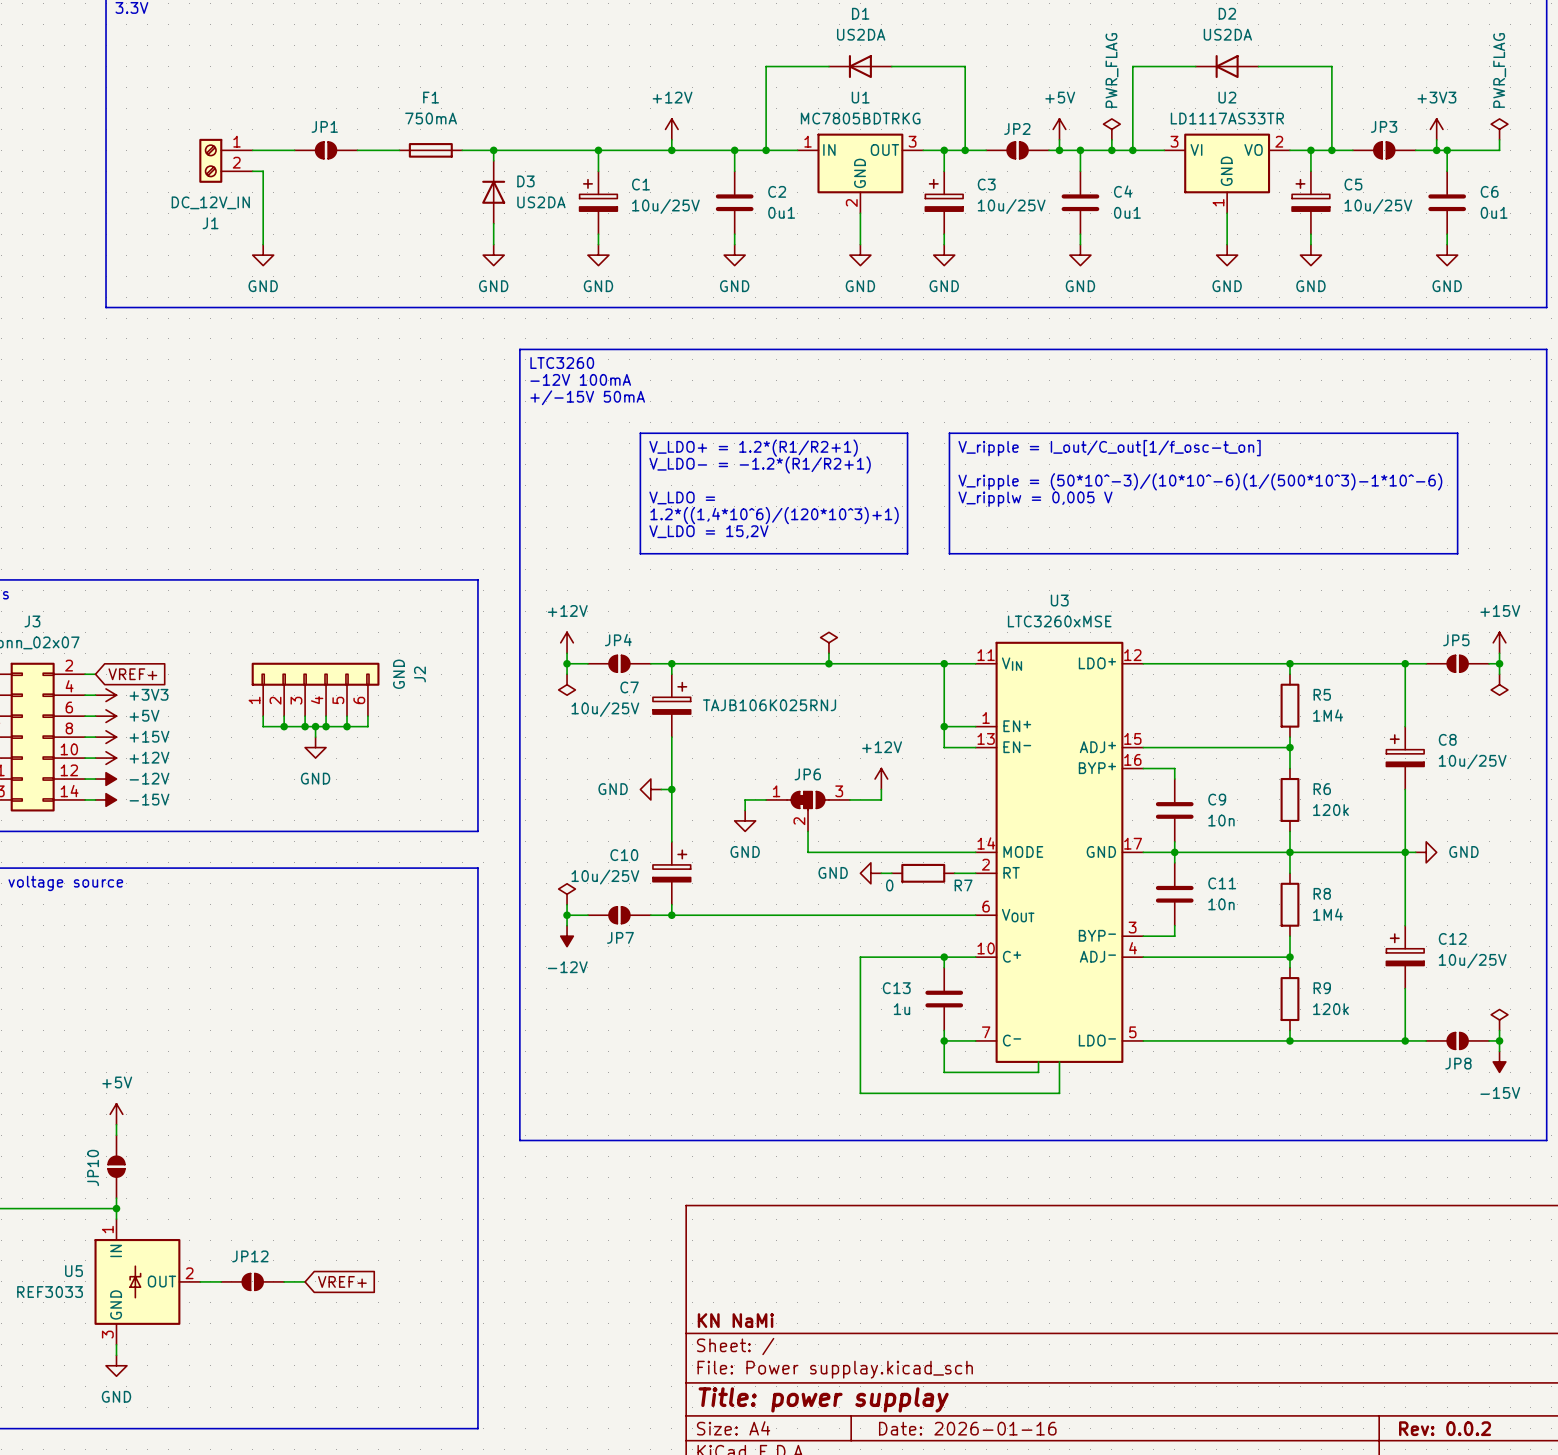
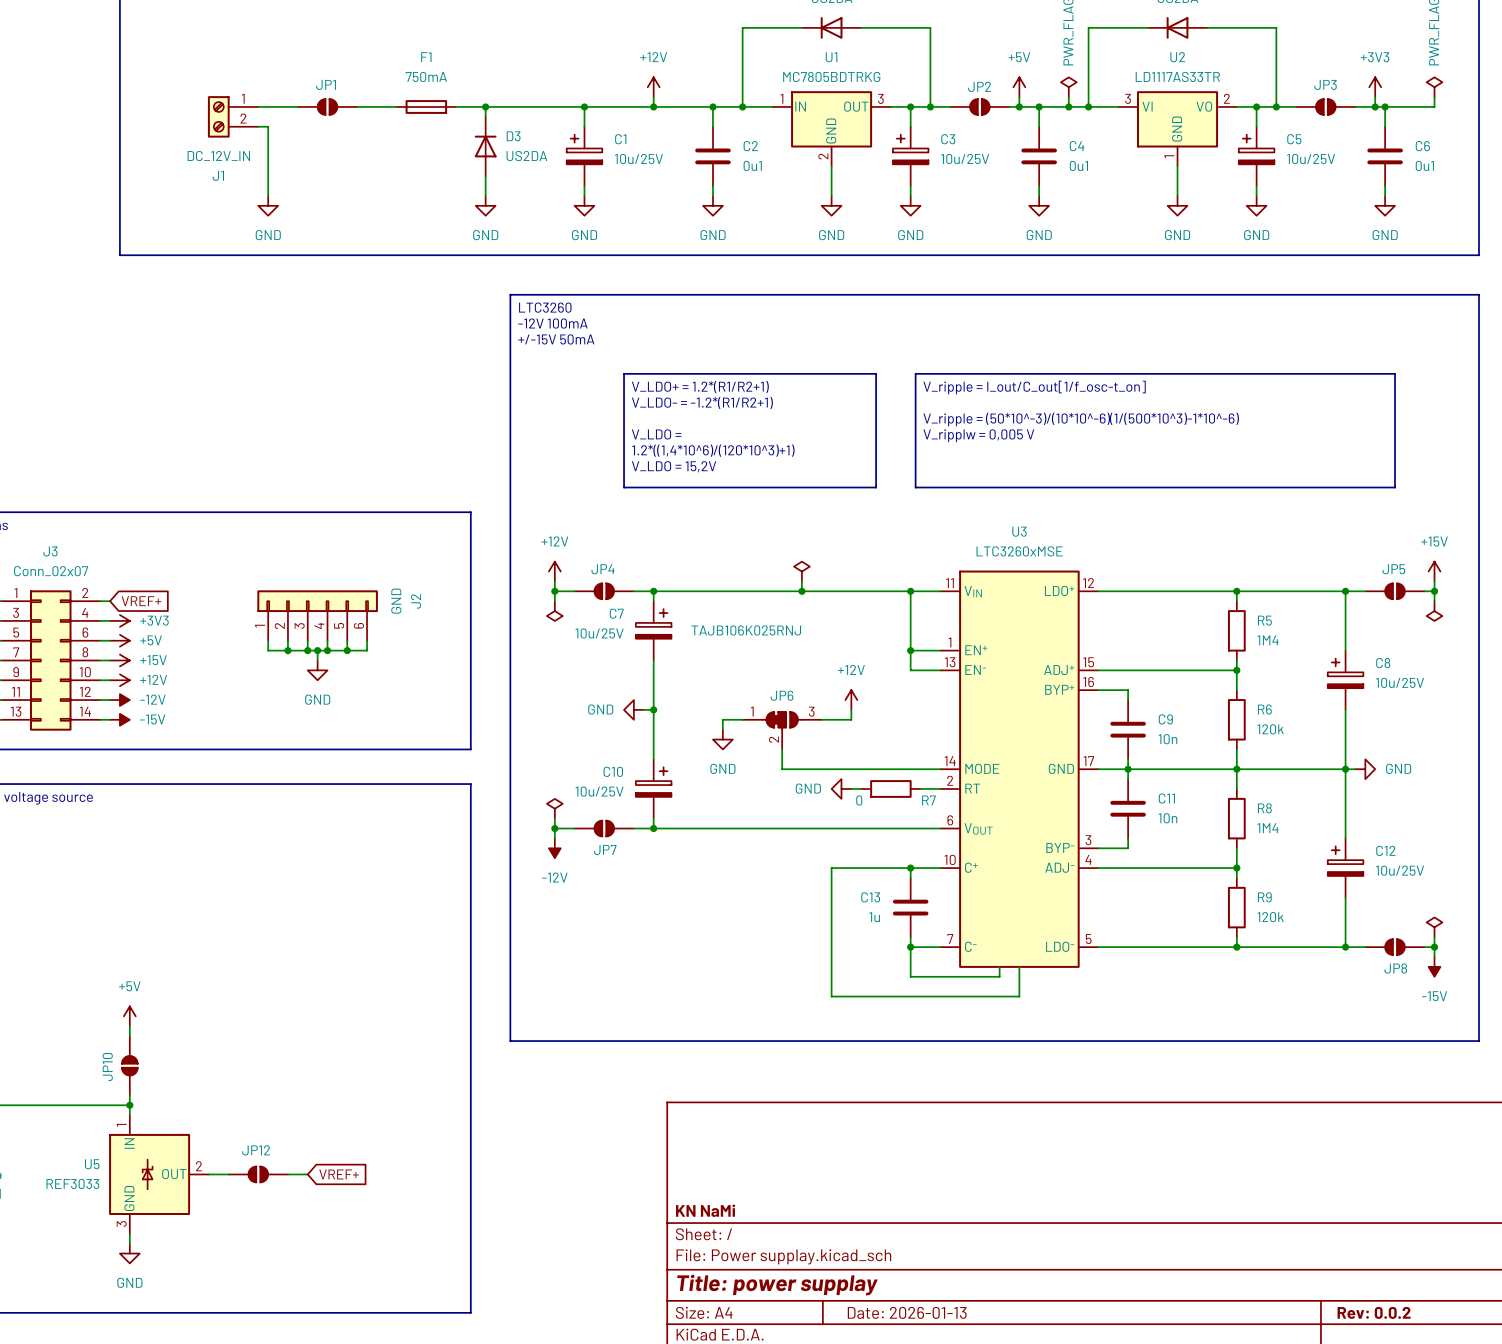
title block: Date: 2026-01-16 (967, 1428) -> Date: 2026-01-13 (907, 1312)

